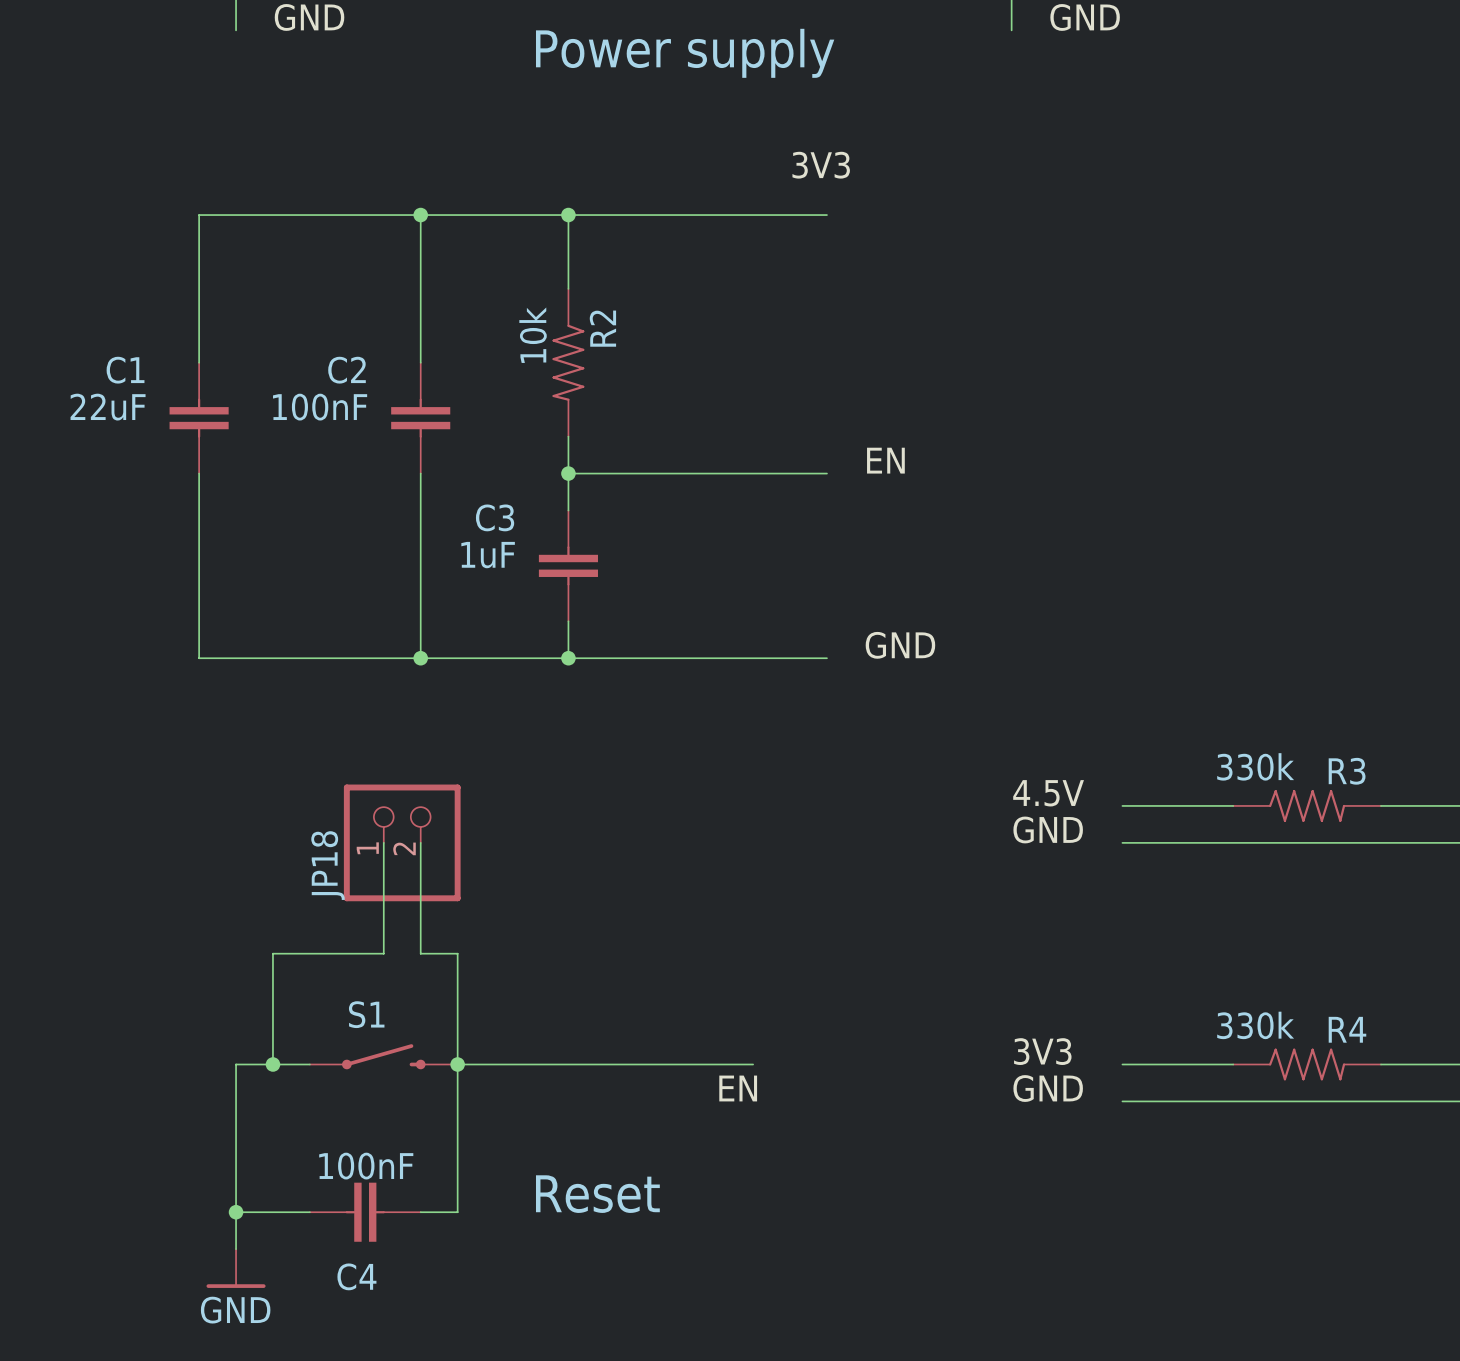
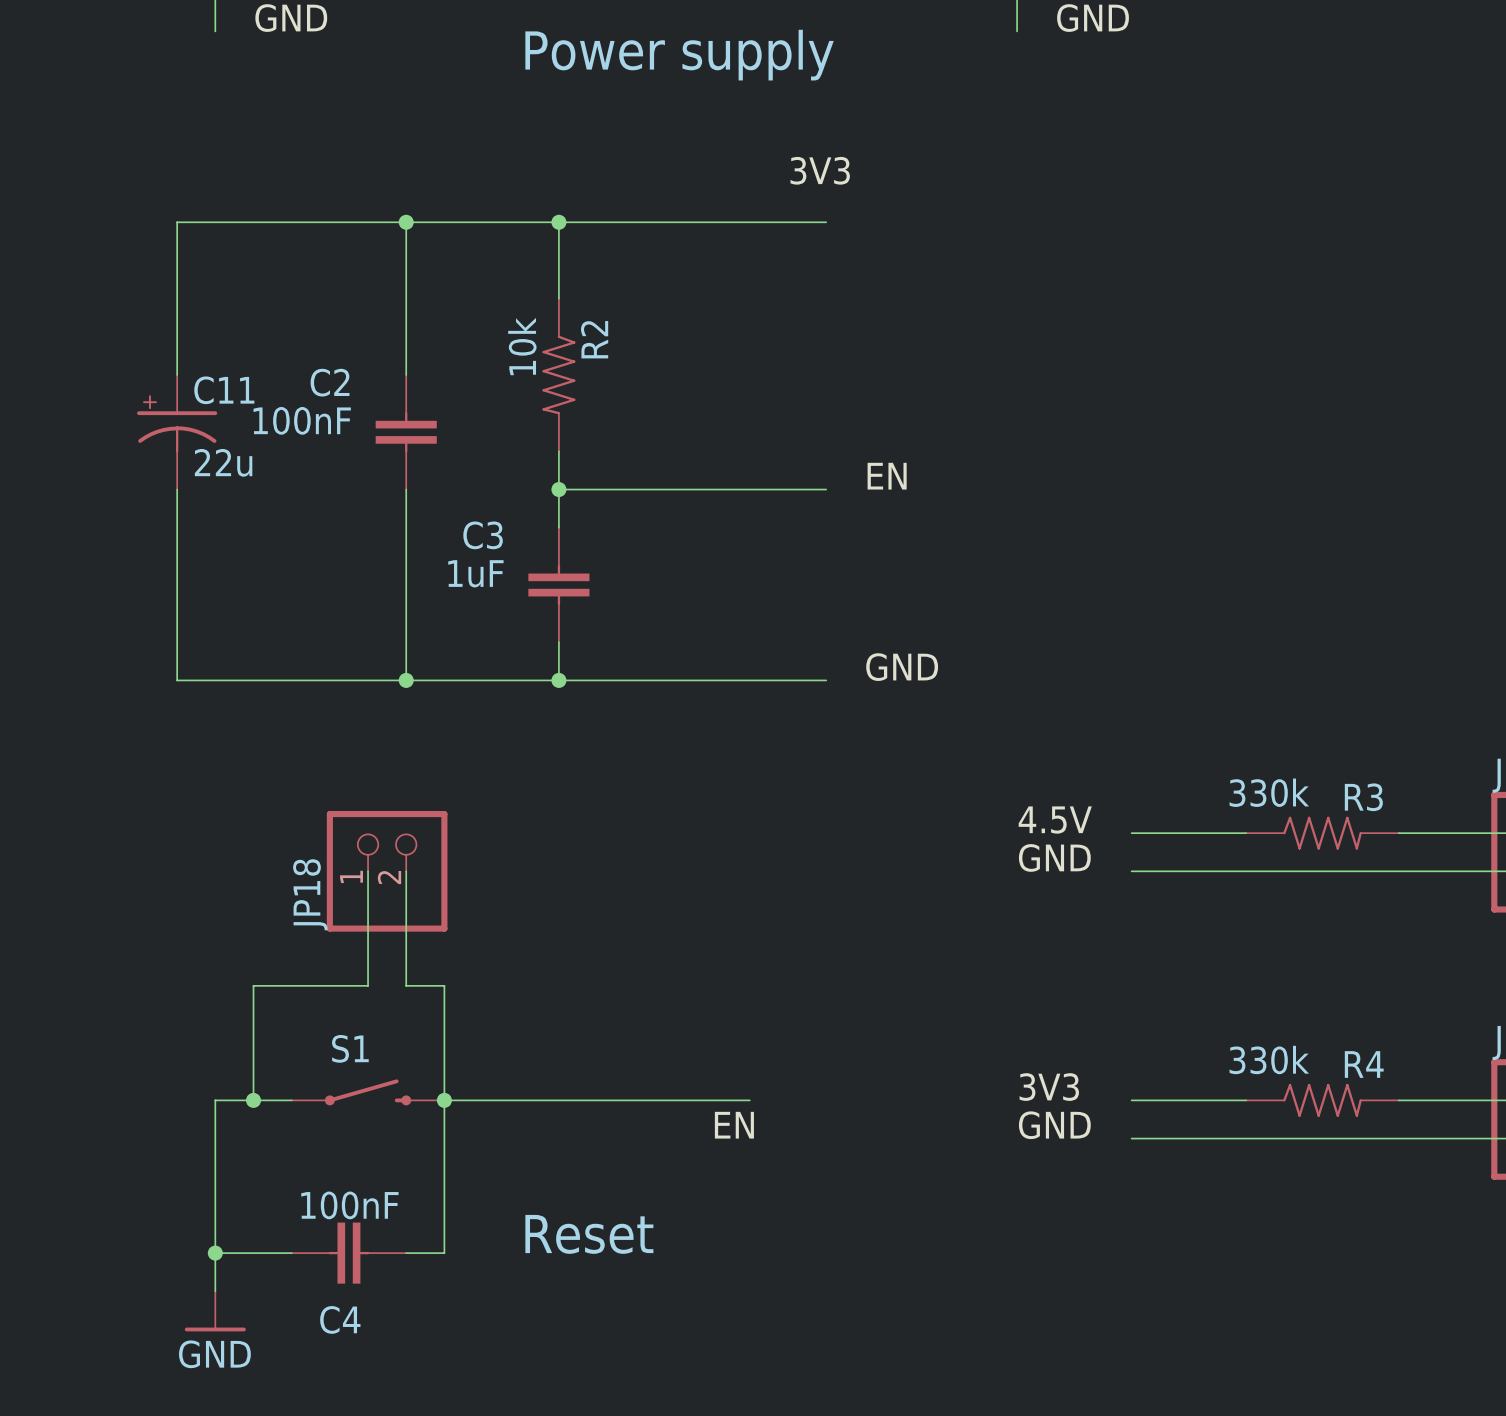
C1: 22uF (199, 418) -> none
C11: none -> 22u (177, 432)

